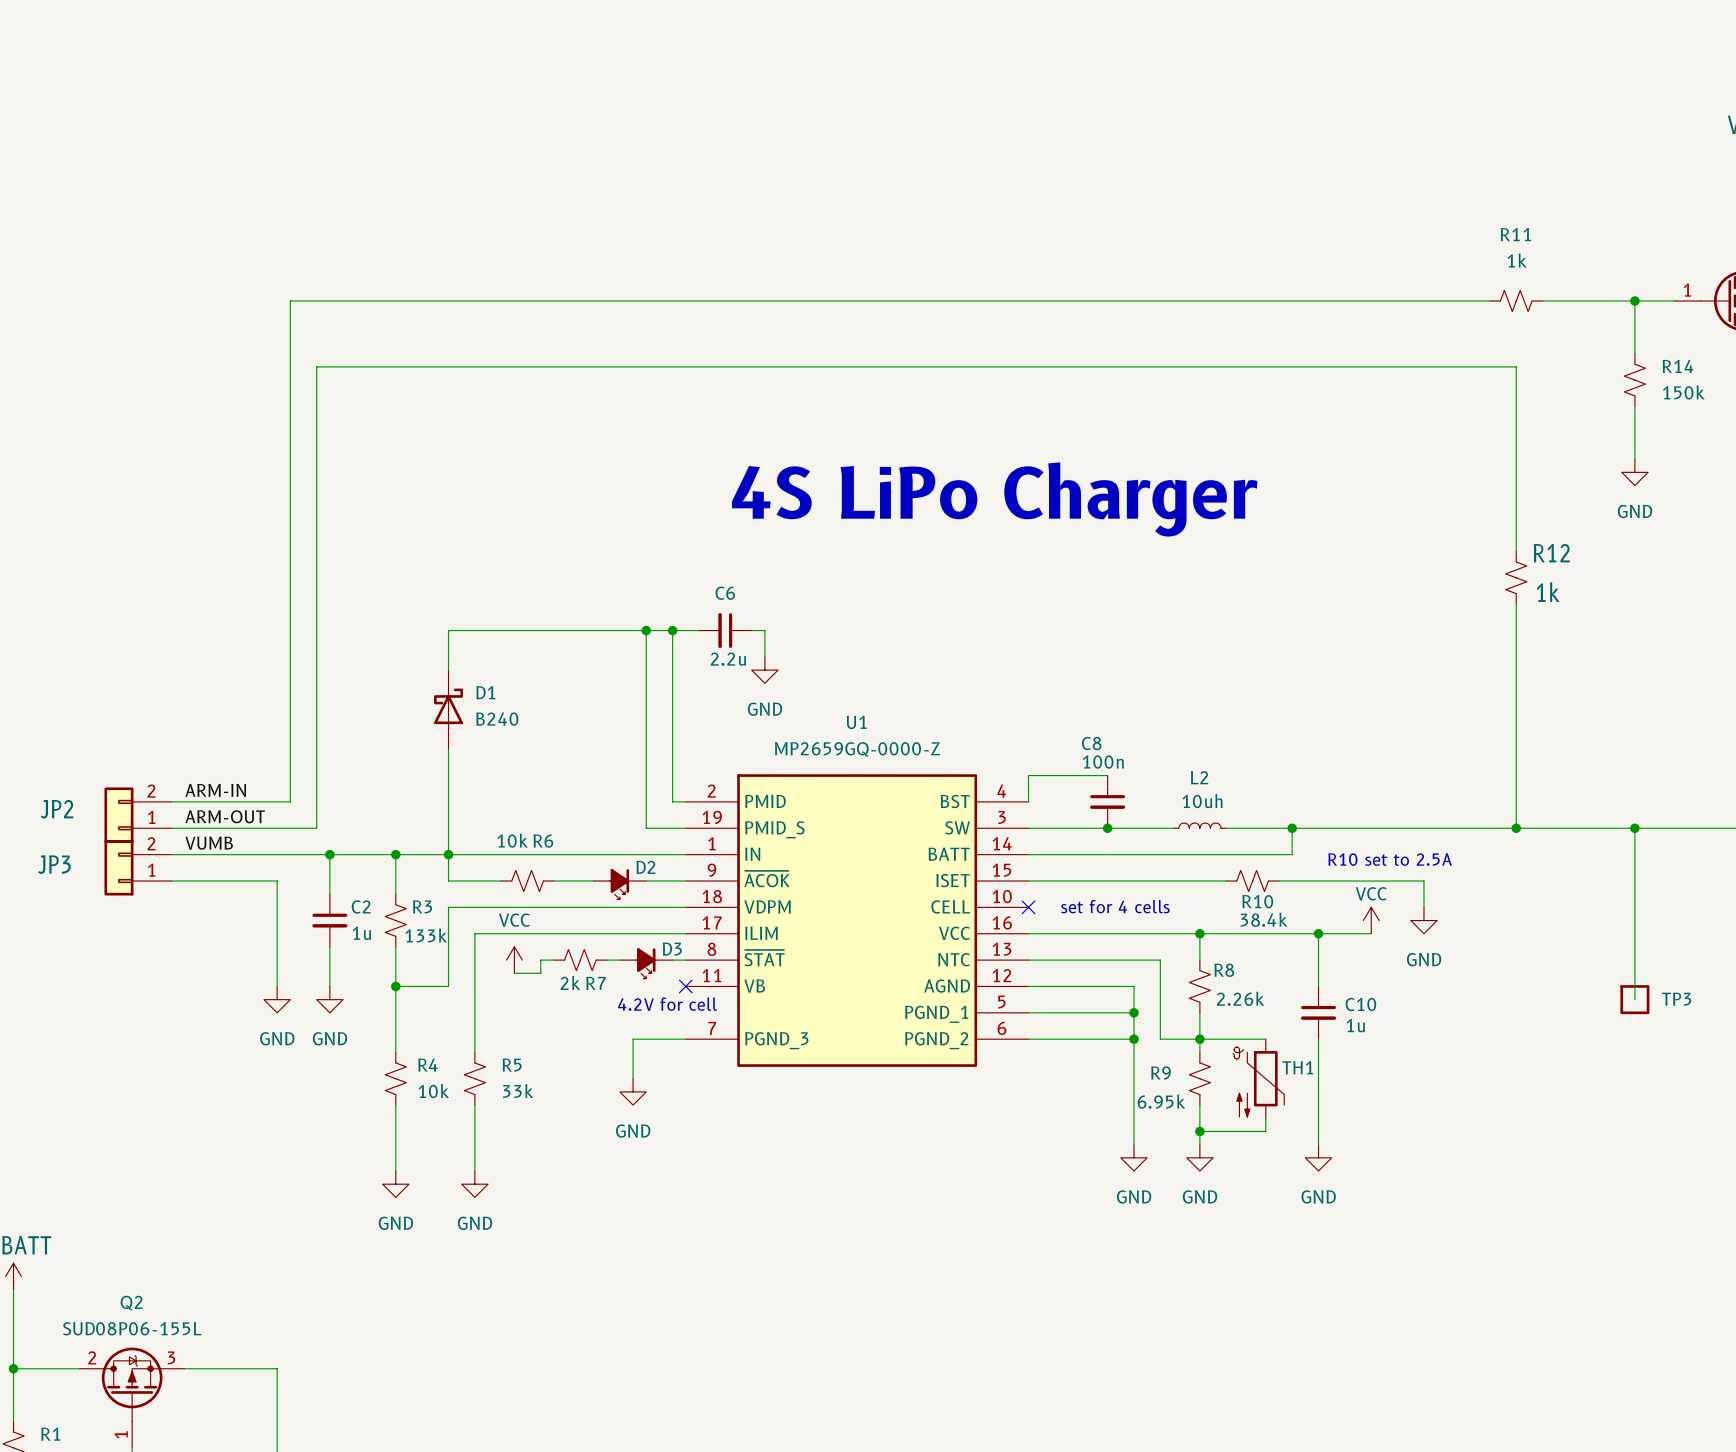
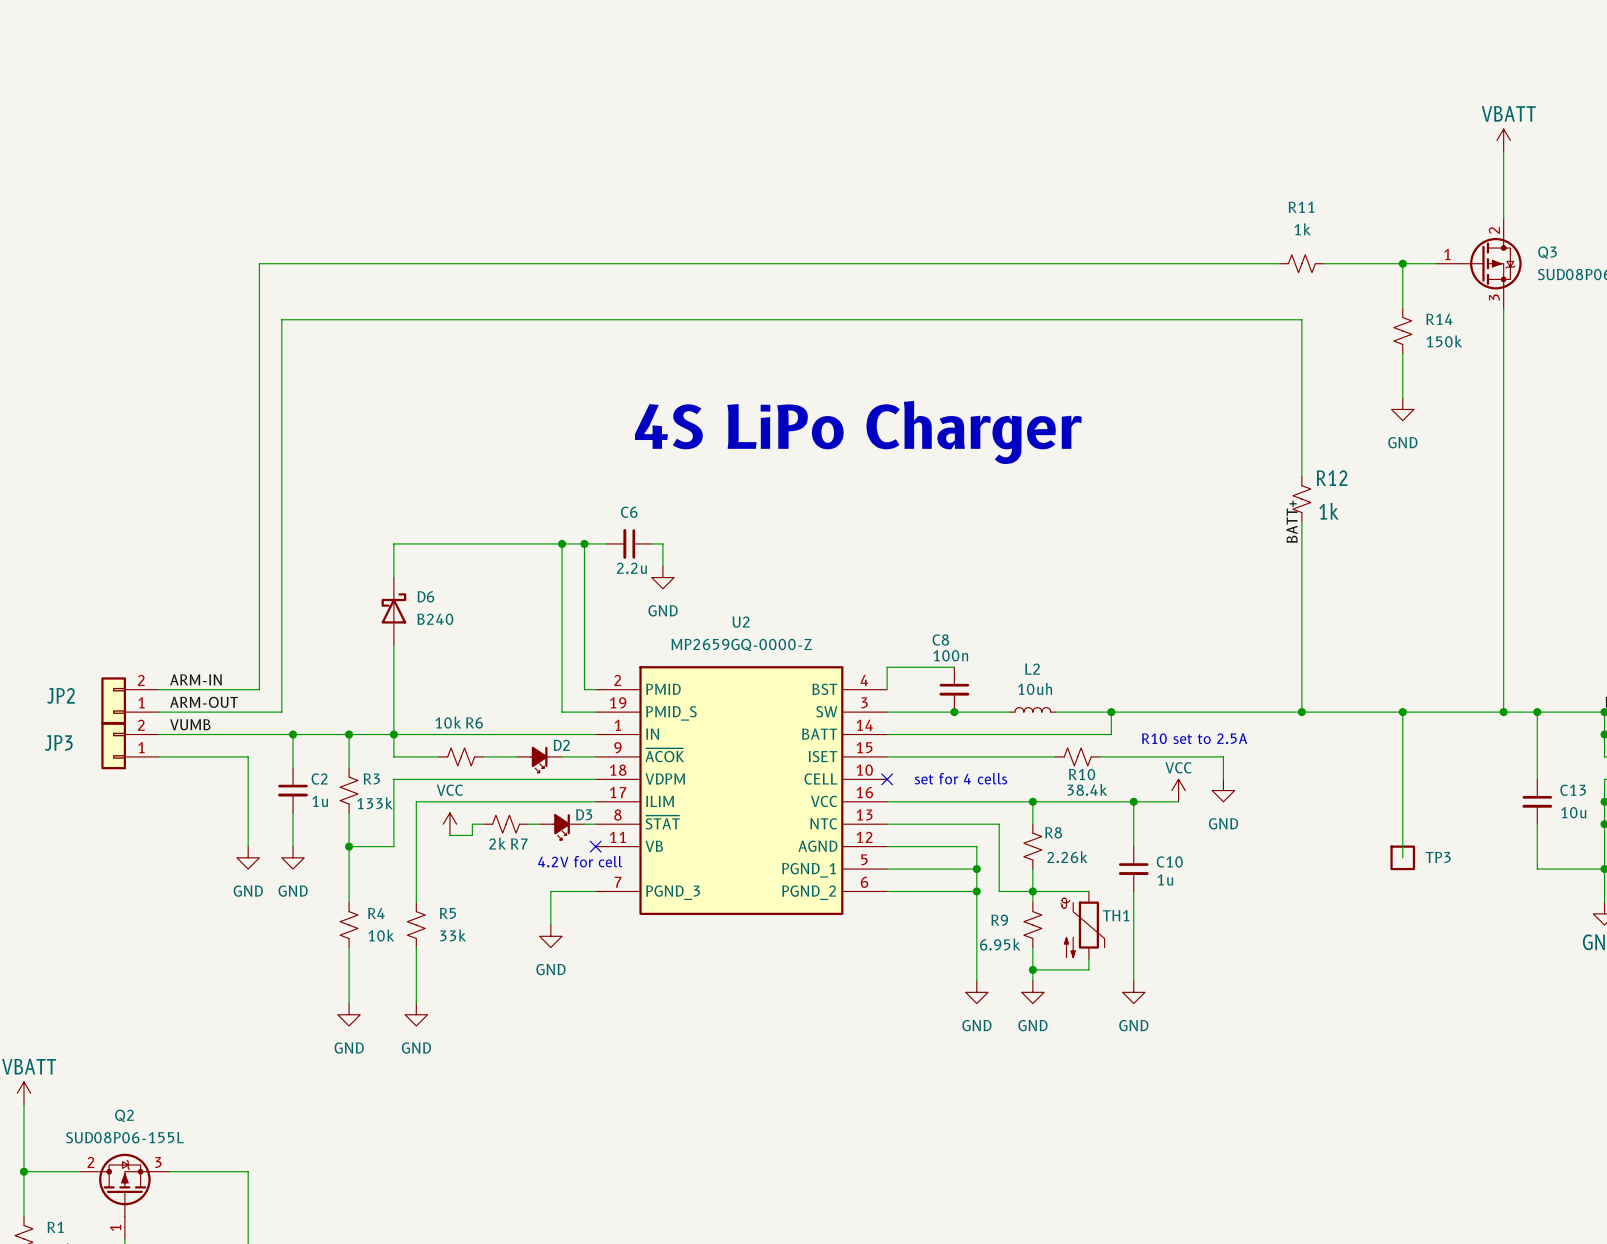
label: none -> BATT+ (1292, 521)
D1 name: D1 (485, 692) -> D6 (425, 596)
U1 name: U1 (856, 722) -> U2 (741, 622)

